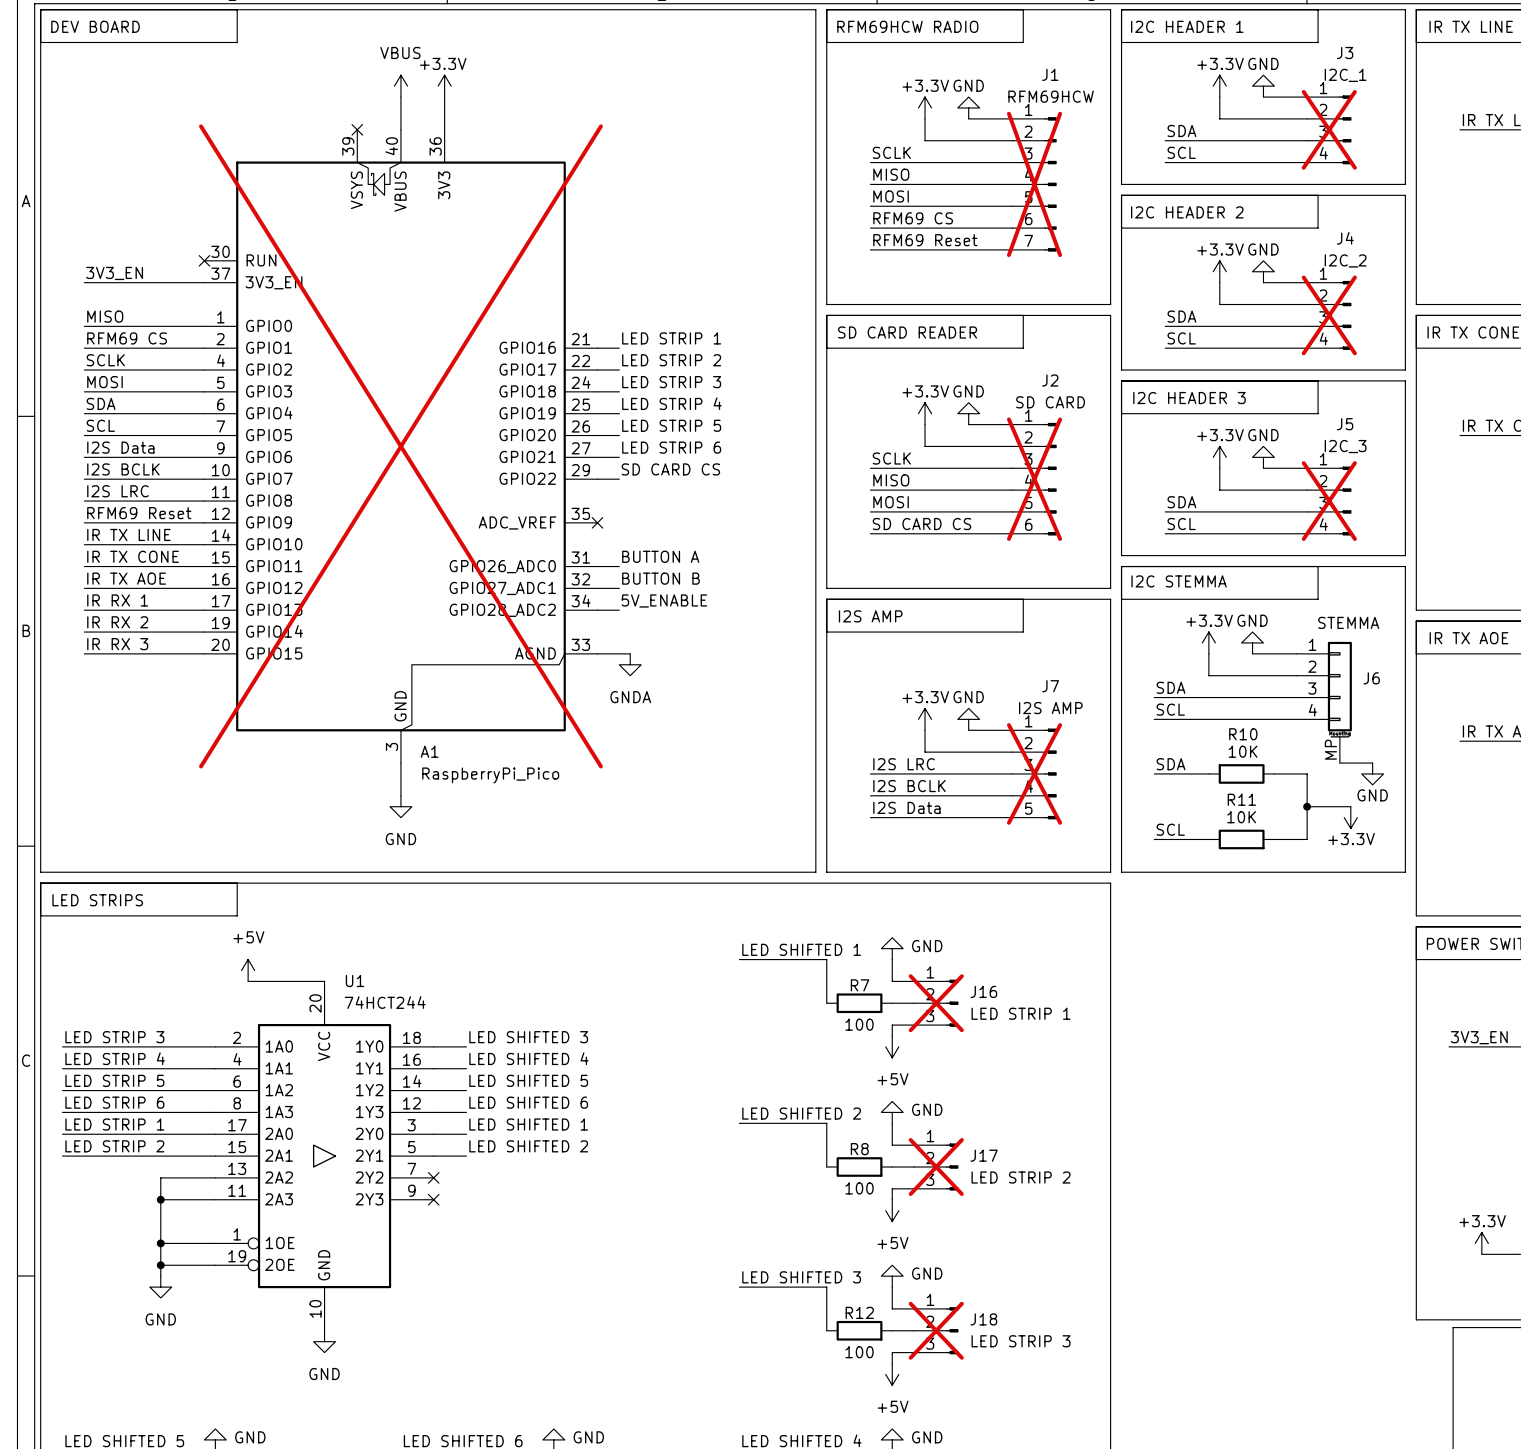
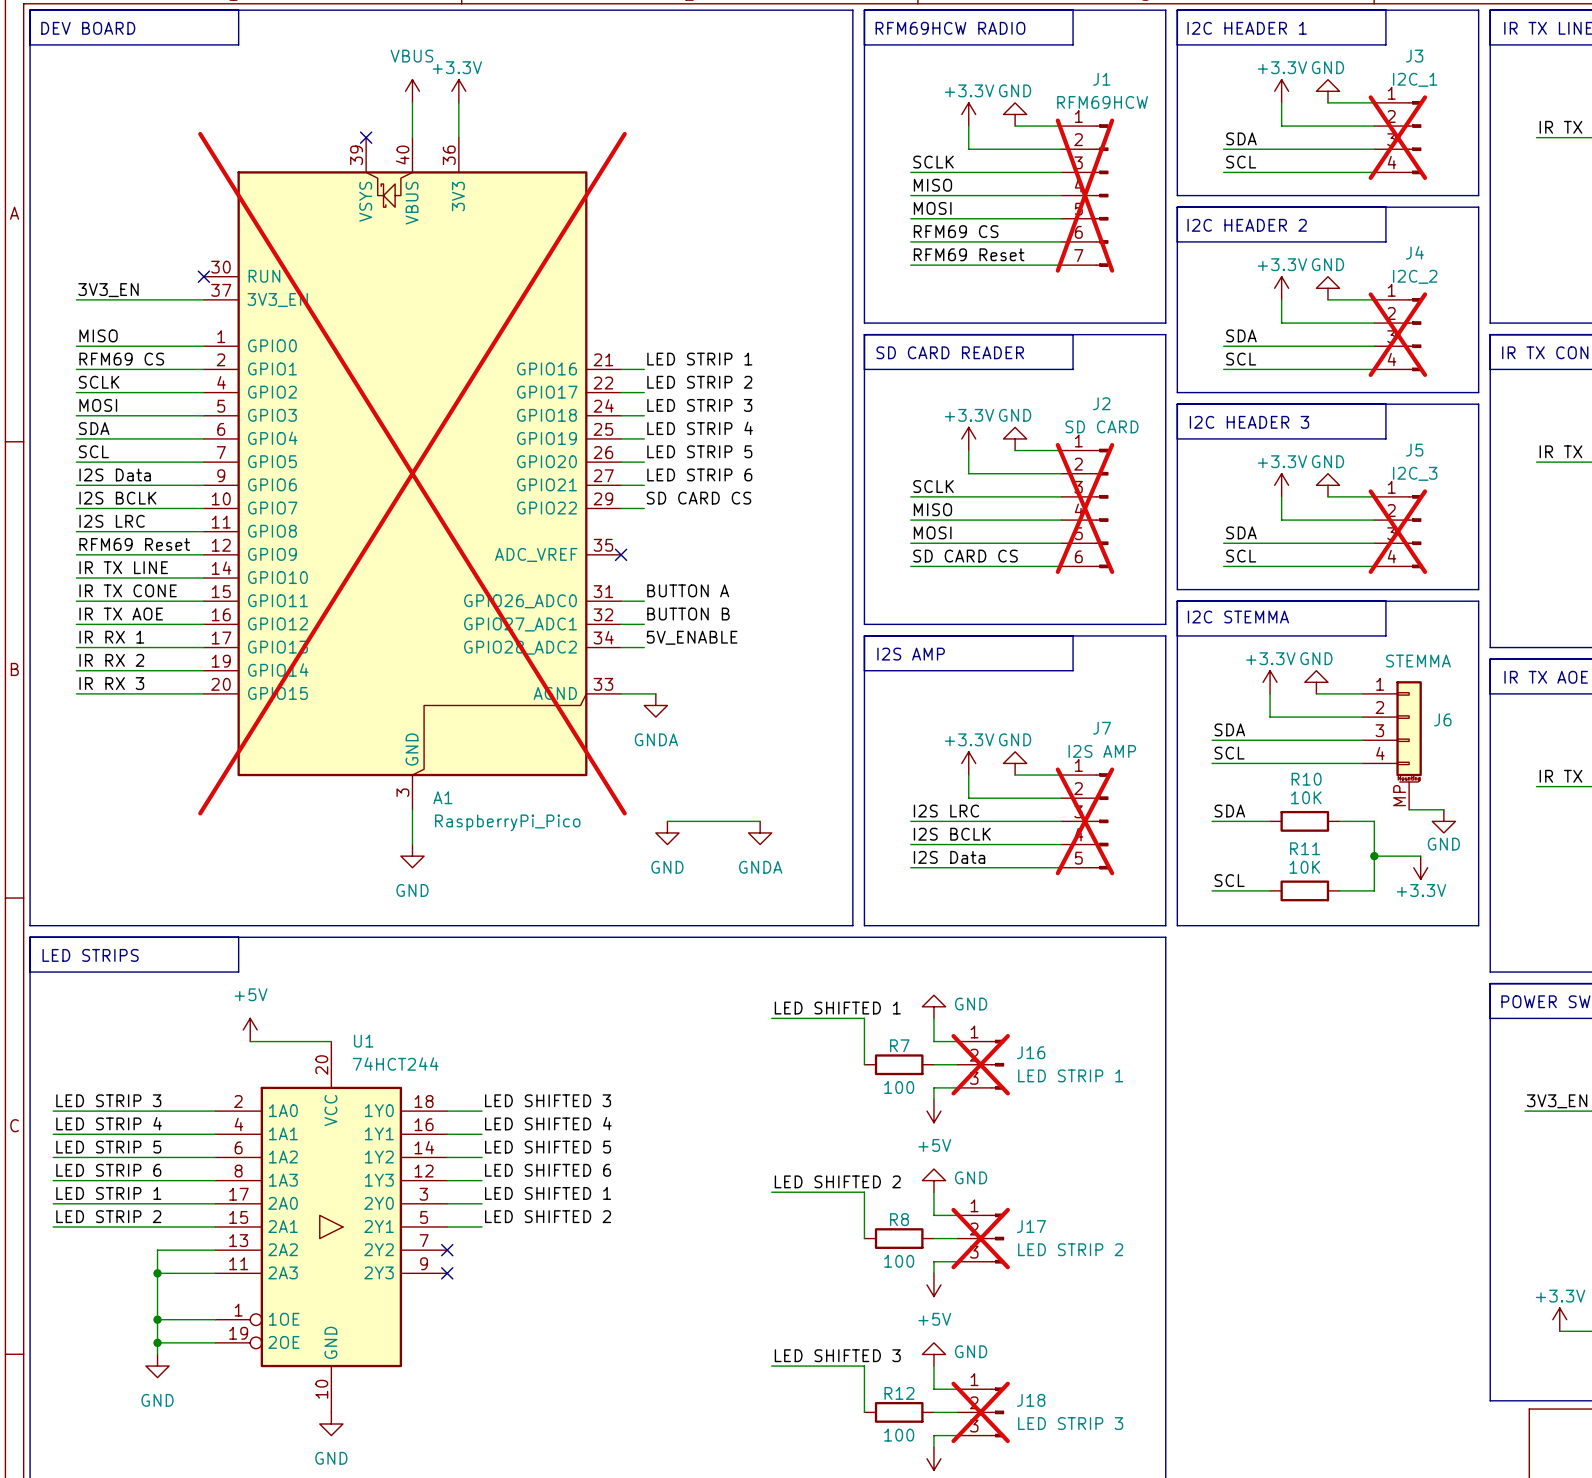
wire: none -> (667, 821) (760, 821)
power symbol: none -> GND (667, 832)
power symbol: none -> GNDA (760, 832)

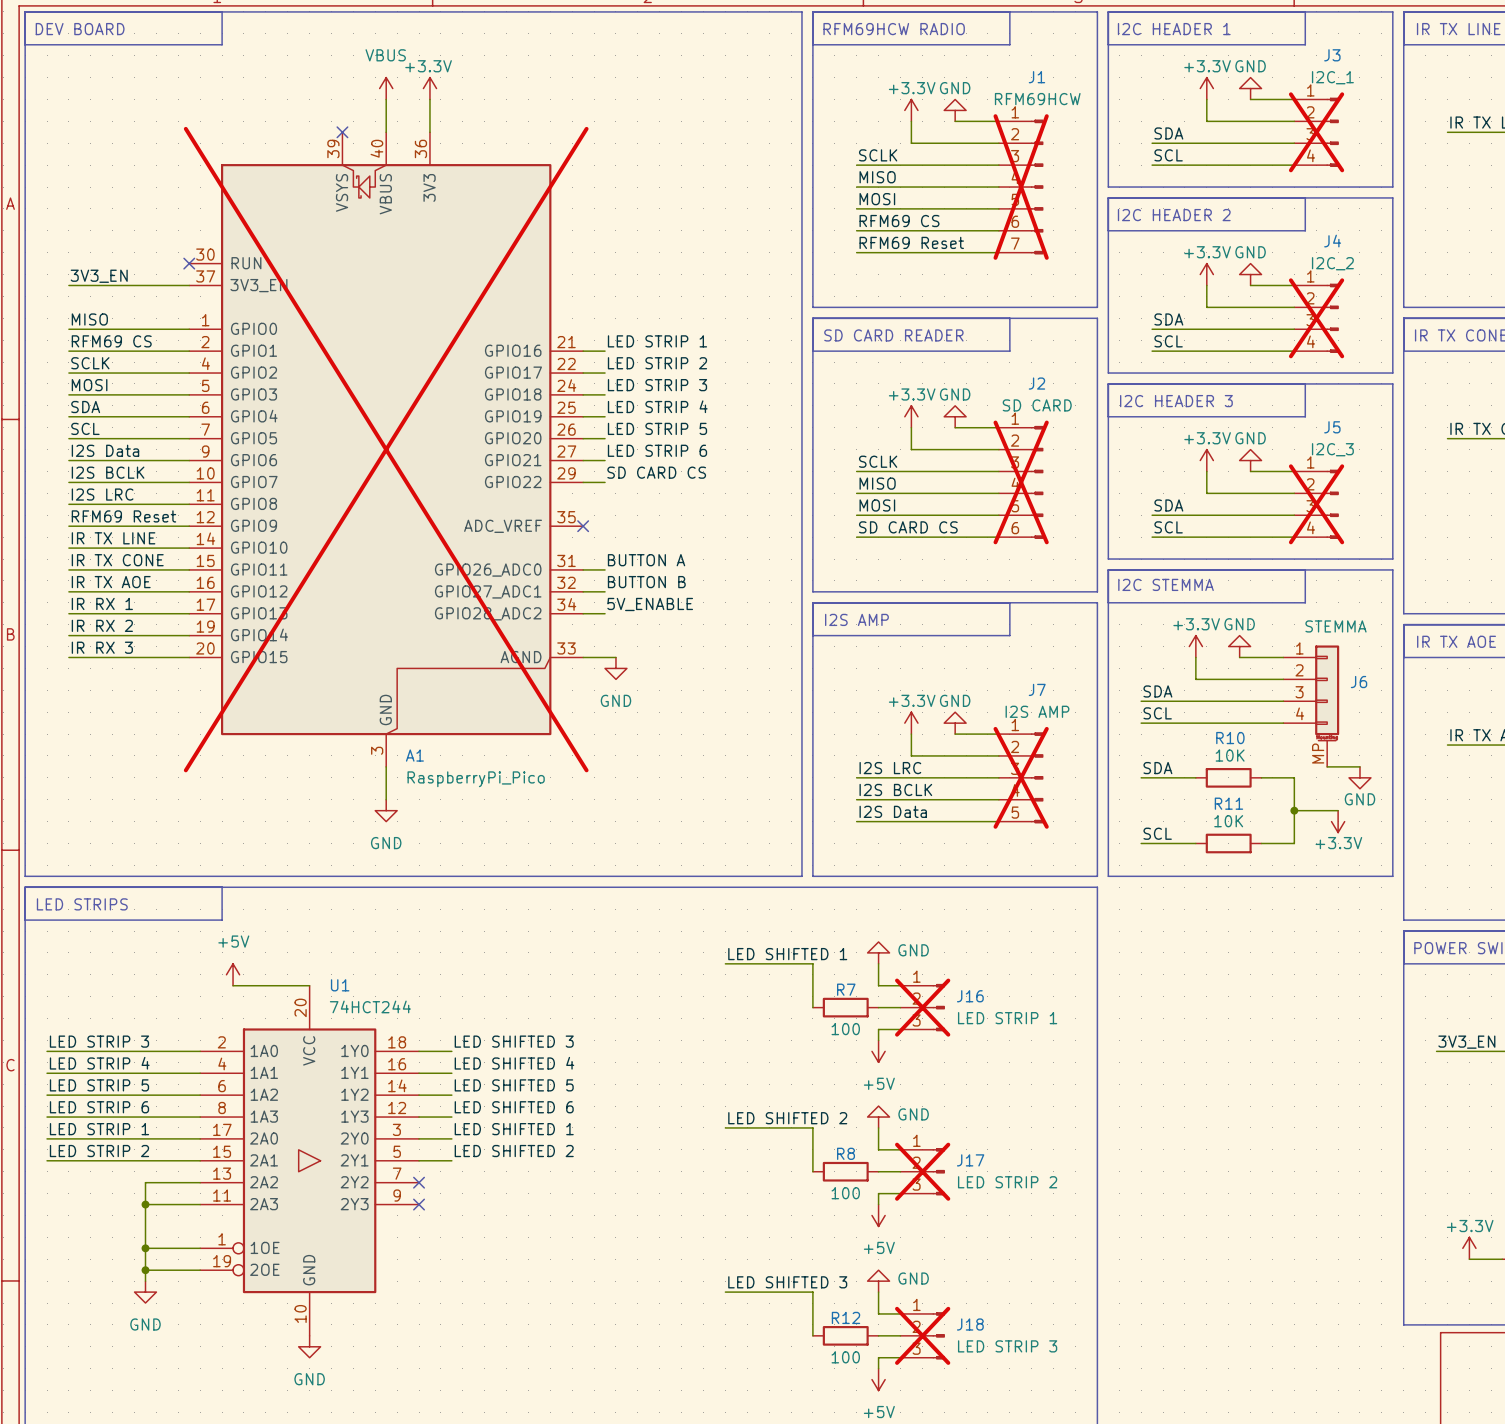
power symbol: GNDA (655, 705) -> GND (615, 668)
wire: (667, 821) (760, 821) -> none
power symbol: GND (667, 832) -> none
power symbol: GNDA (760, 832) -> none

